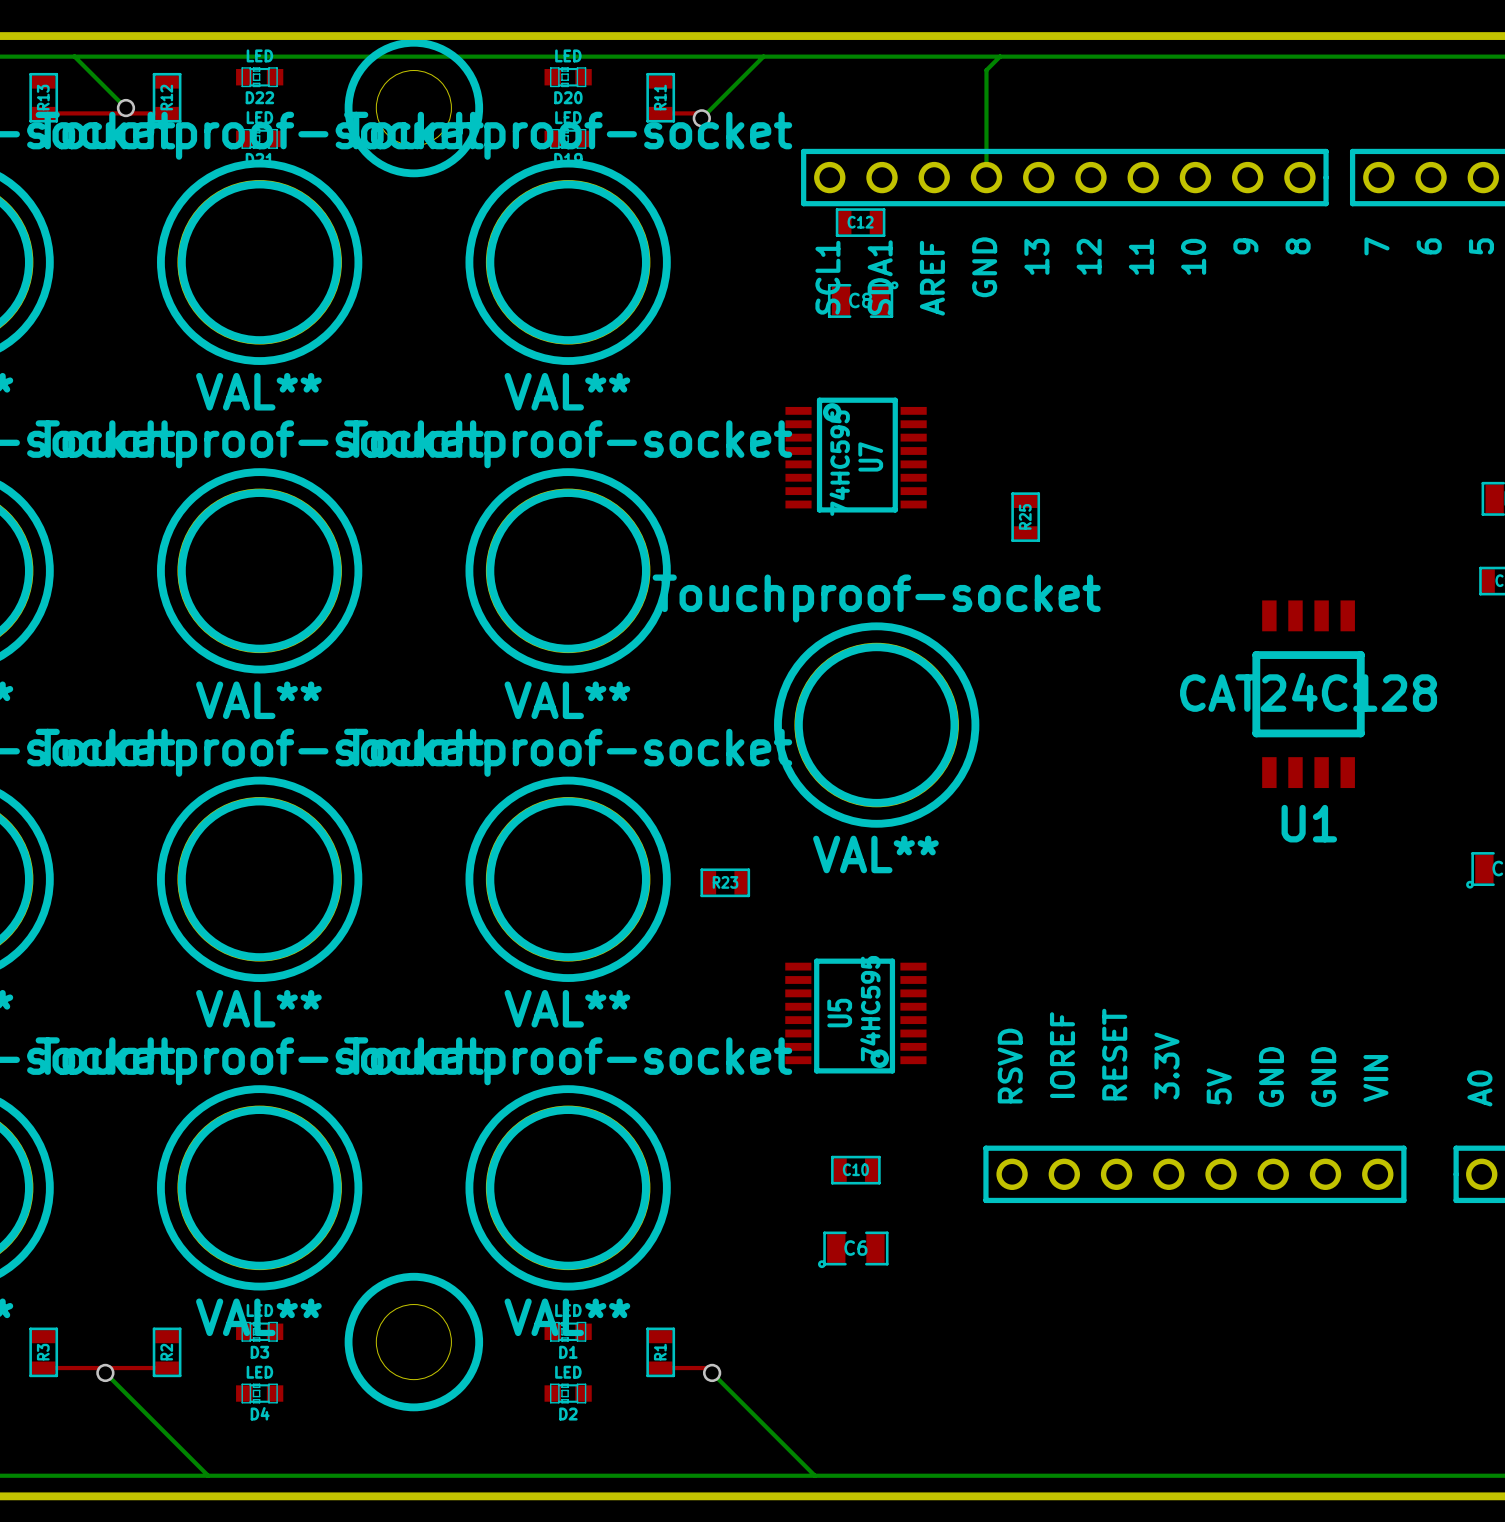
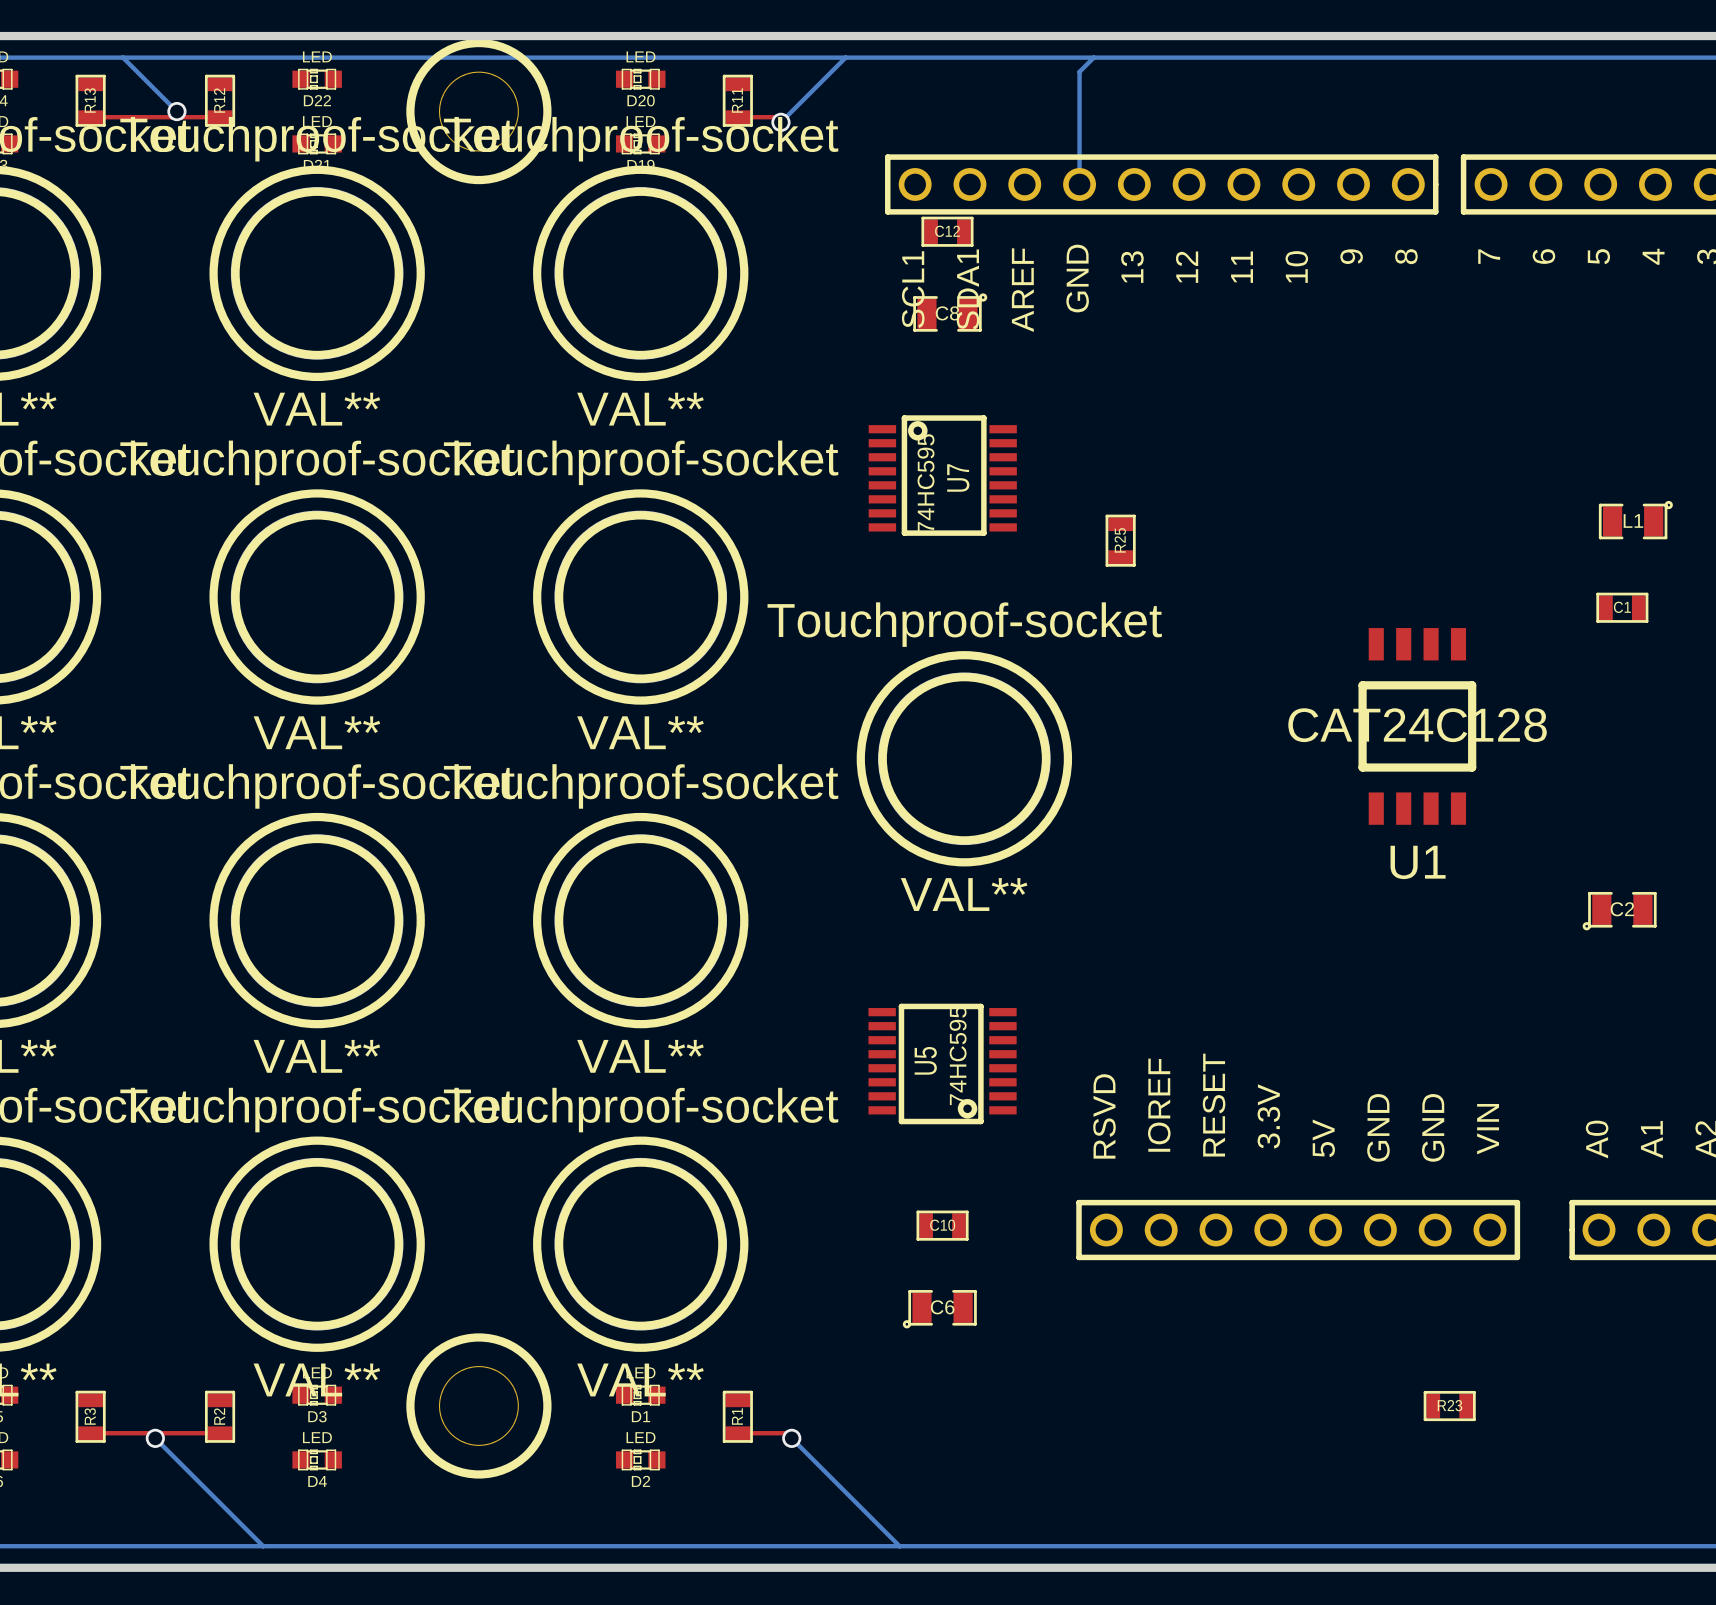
R23 position: (725, 882) -> (1449, 1406)

